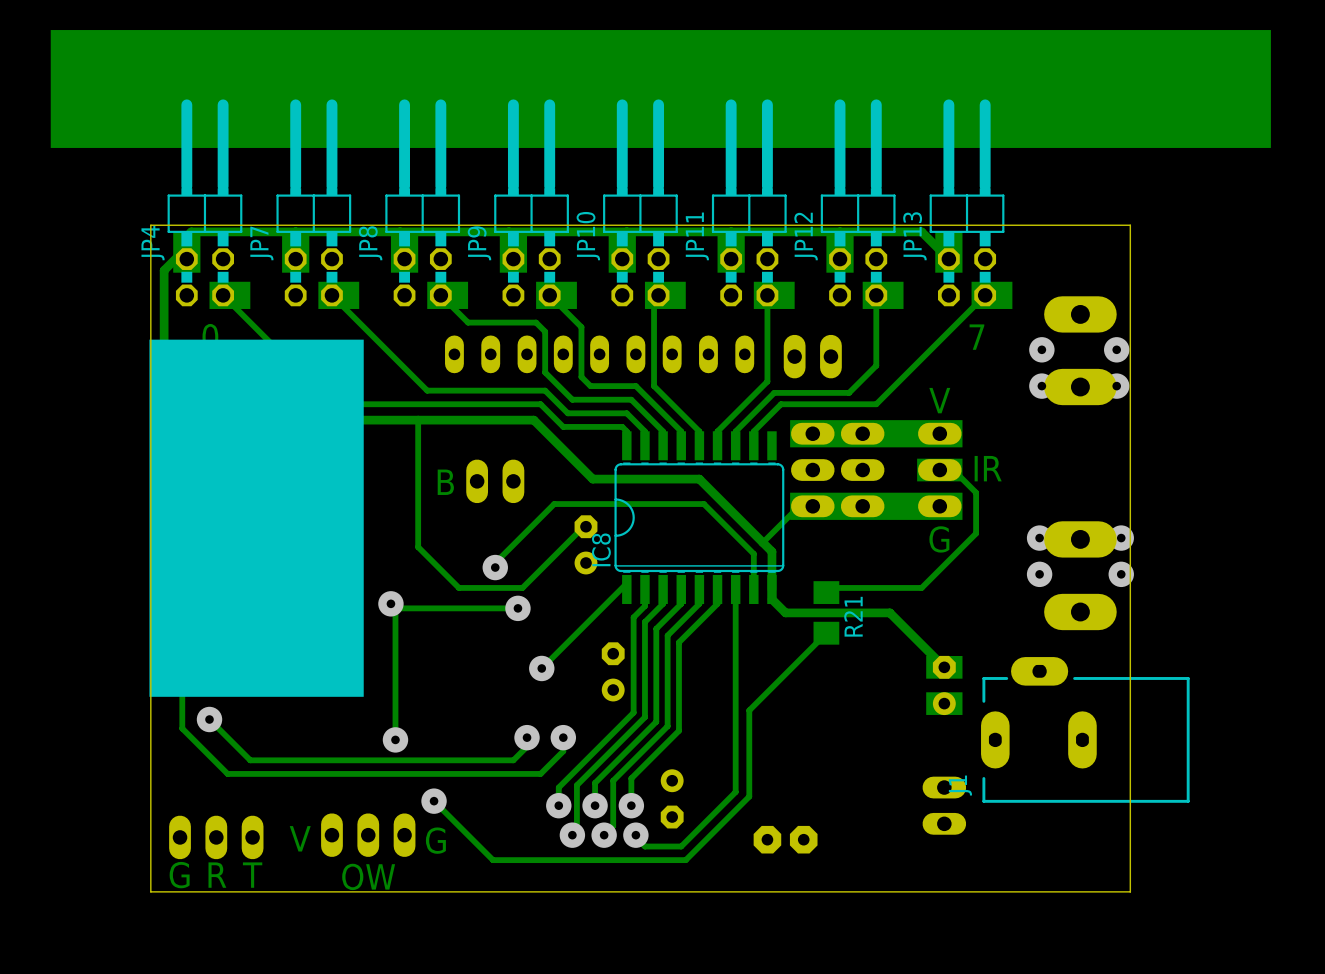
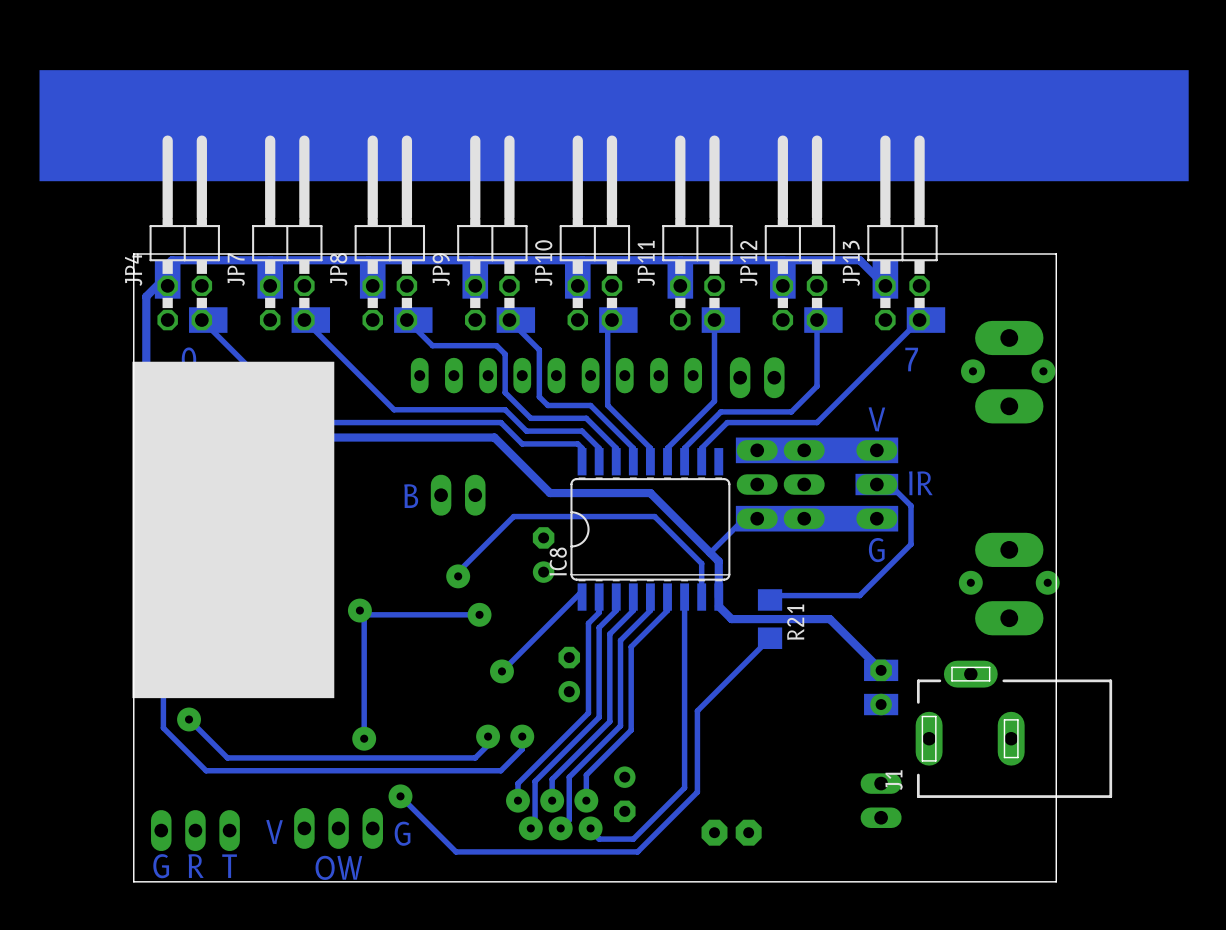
via: (1041, 386) -> none
via: (1116, 386) -> none
track: (418, 420) (418, 547) (458, 587) (522, 587) (581, 528) (585, 526) -> none
via: (1039, 538) -> none
via: (1121, 538) -> none

